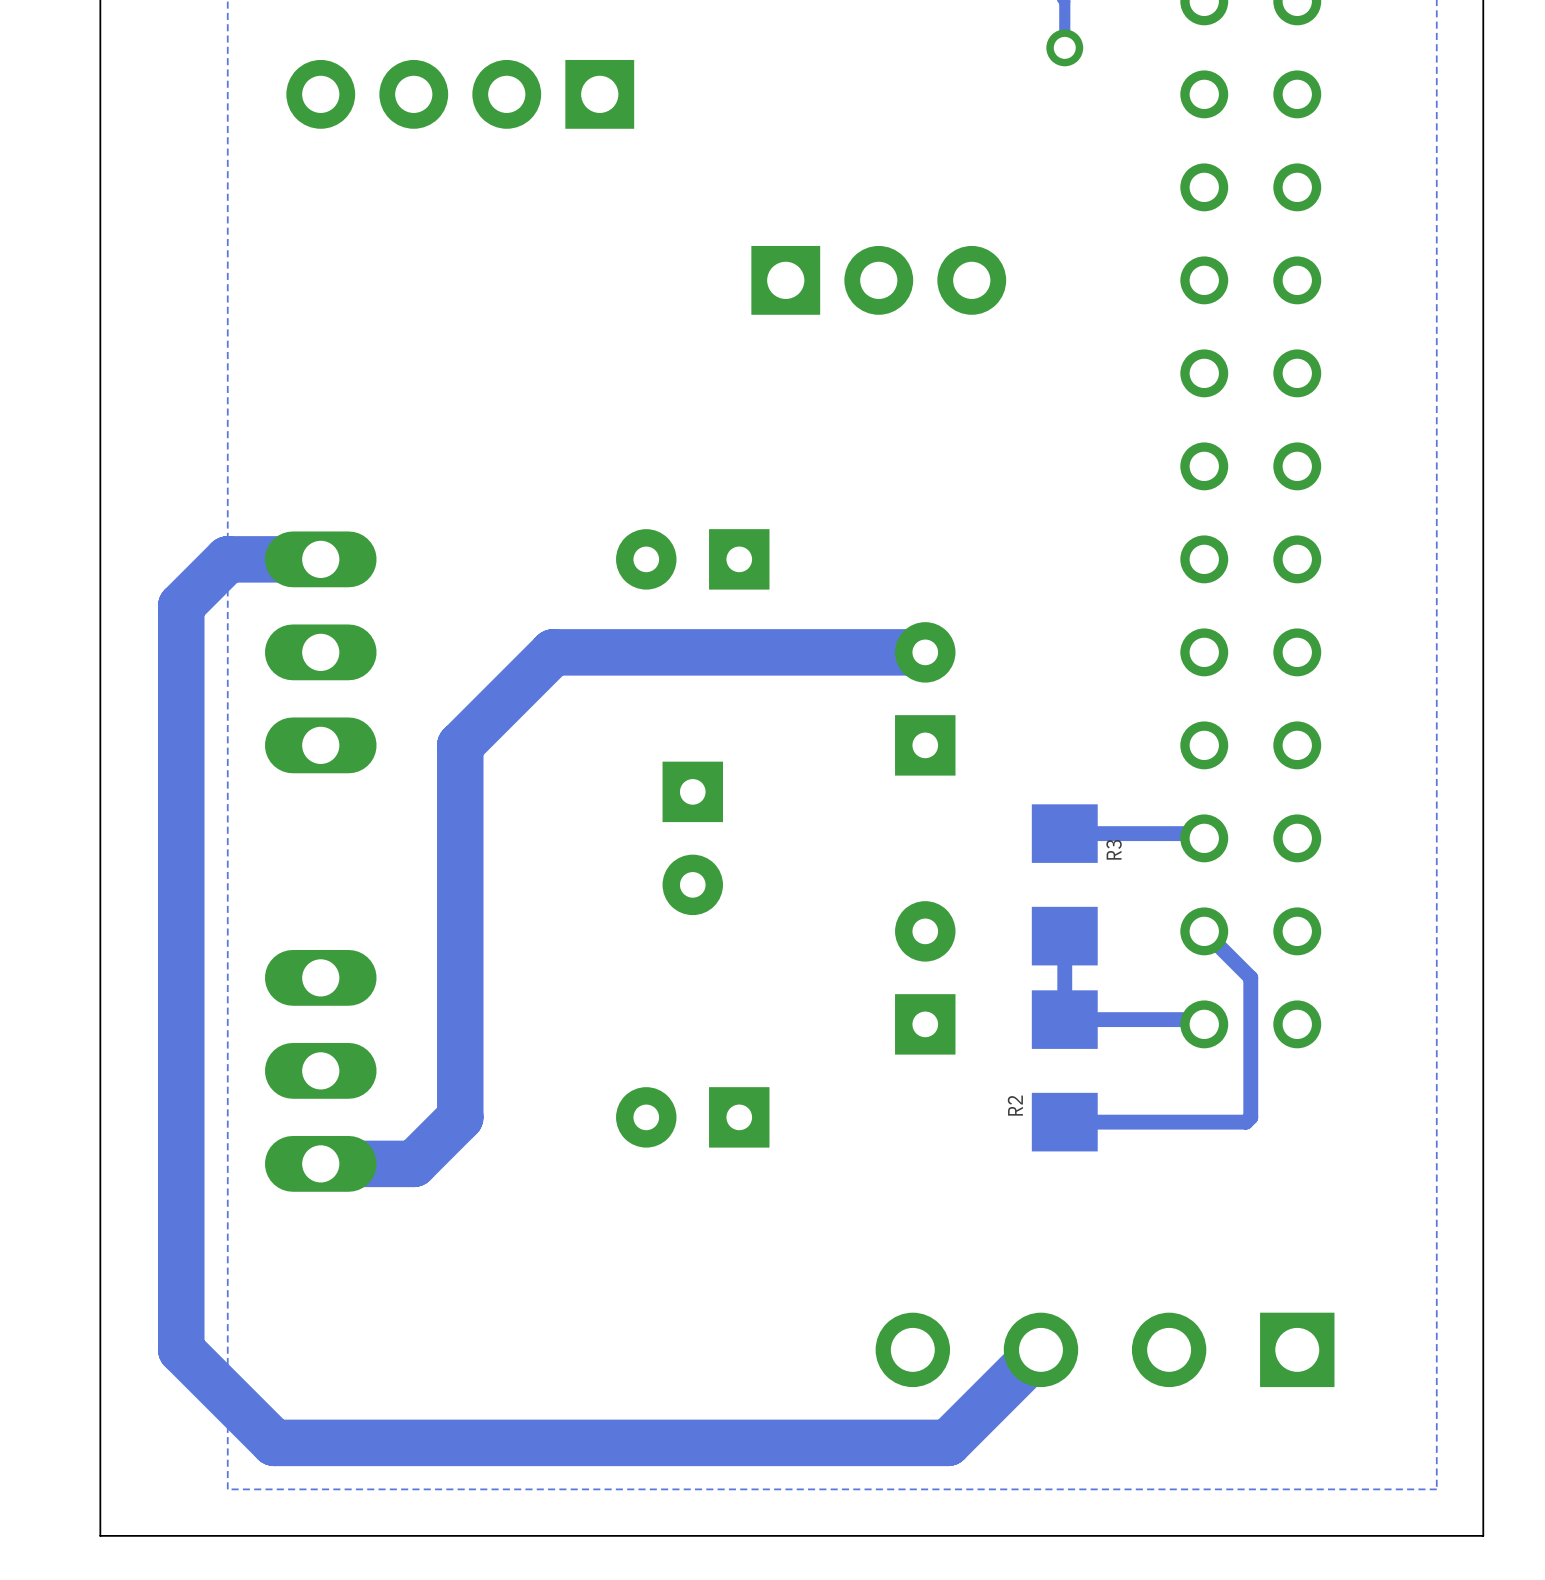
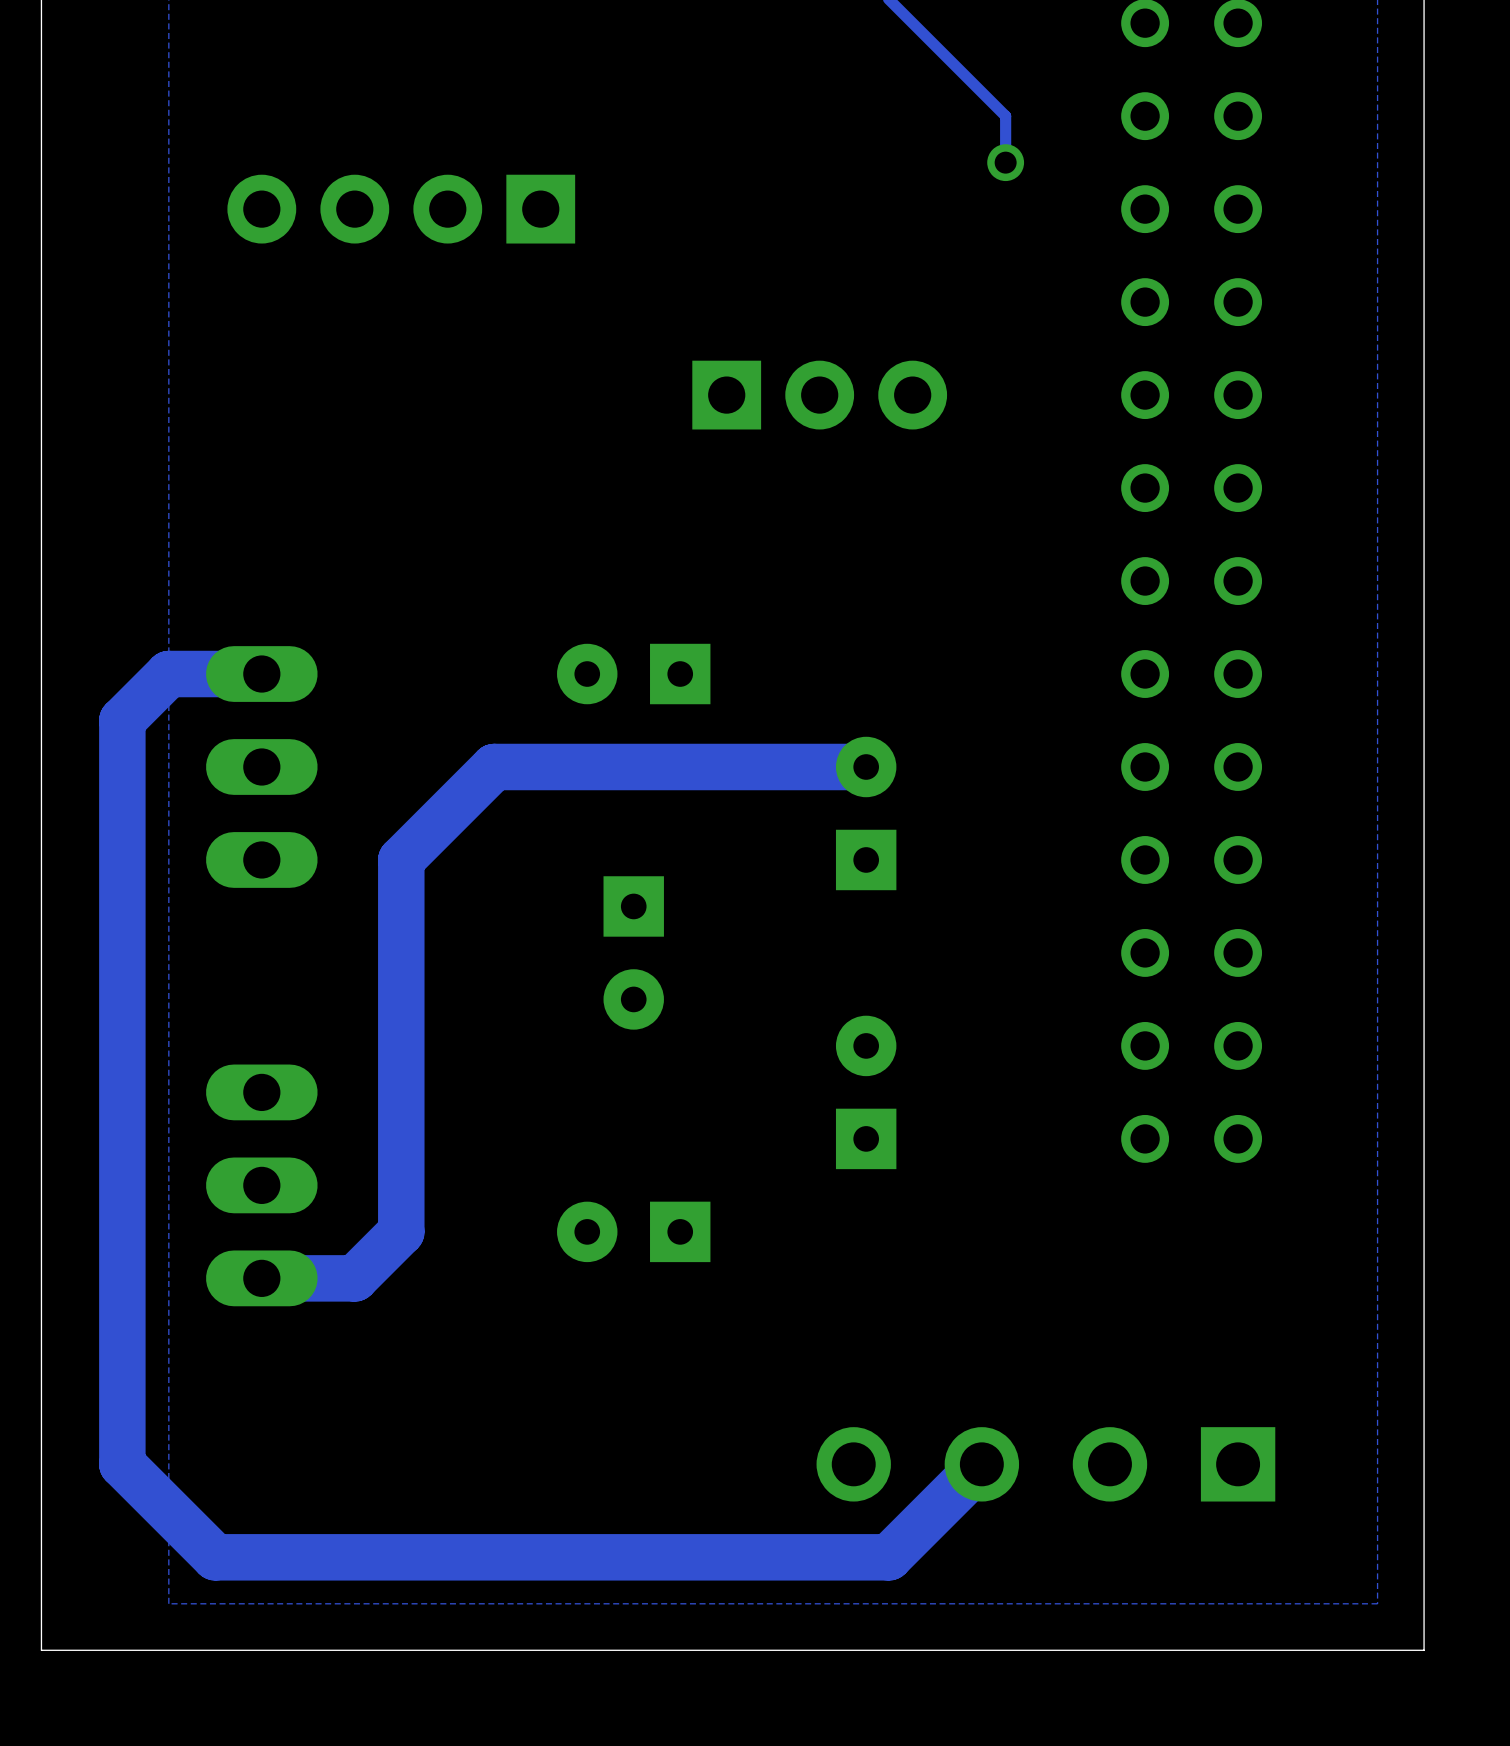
track: (1064, 833) (1204, 833) (1204, 838) -> none
R3: (1064, 884) -> none
track: (1204, 931) (1250, 977) (1250, 1117) (1246, 1122) (1064, 1122) -> none
track: (1064, 936) (1064, 1019) (1204, 1019) (1204, 1024) -> none
R2: (1064, 1070) -> none

